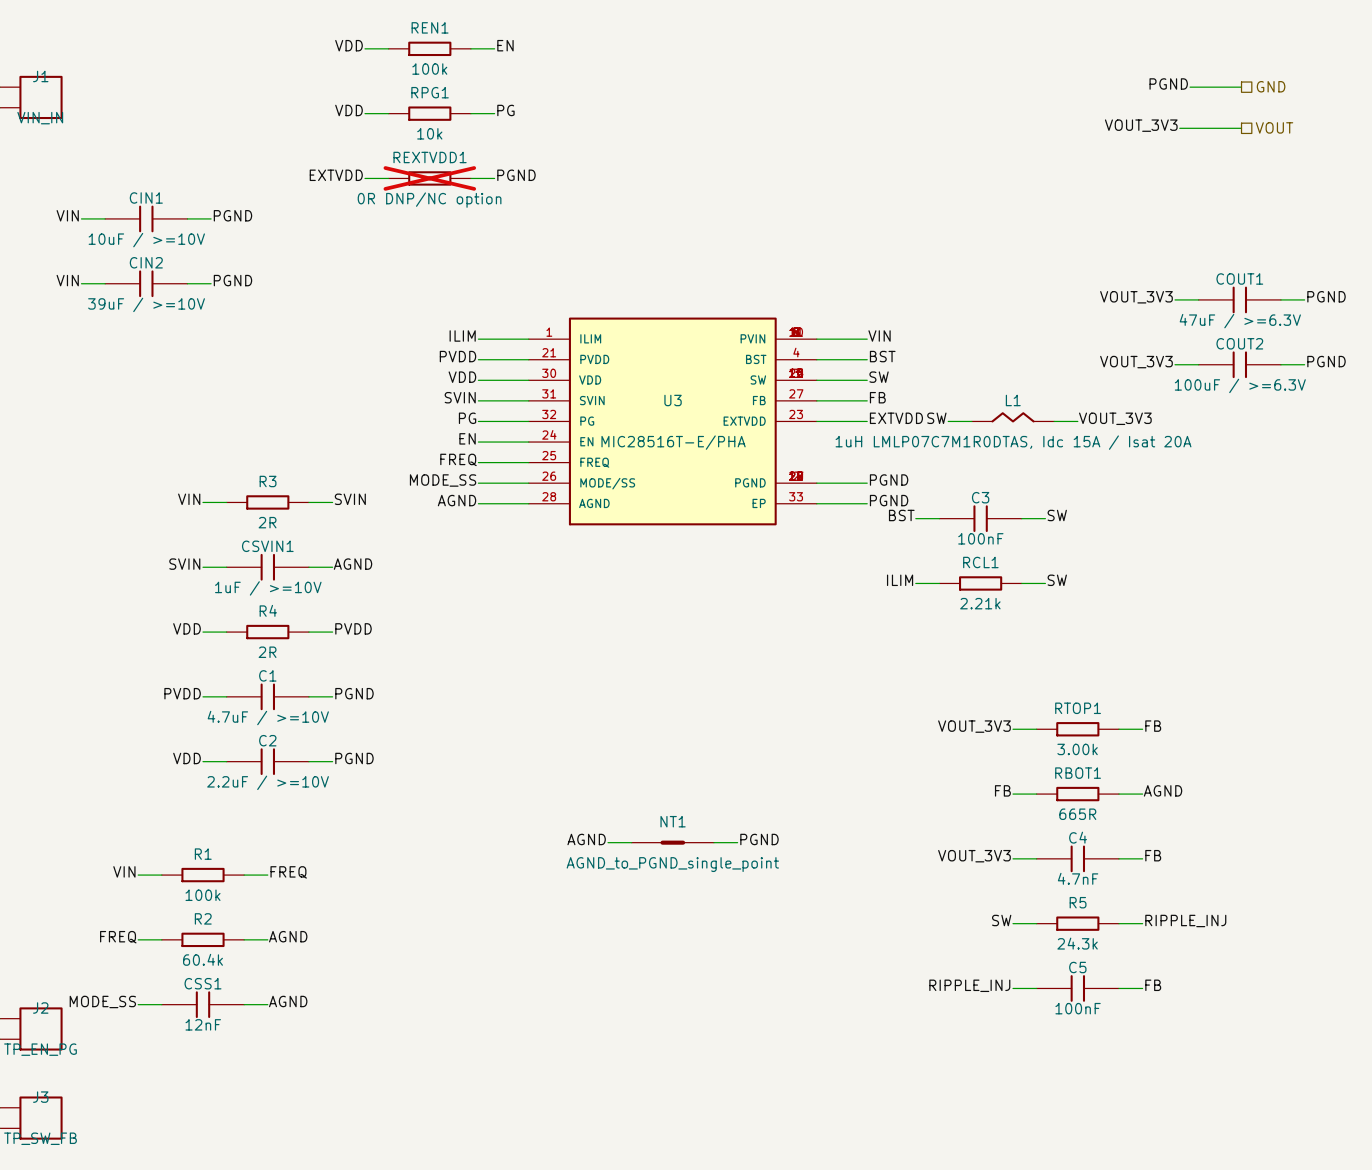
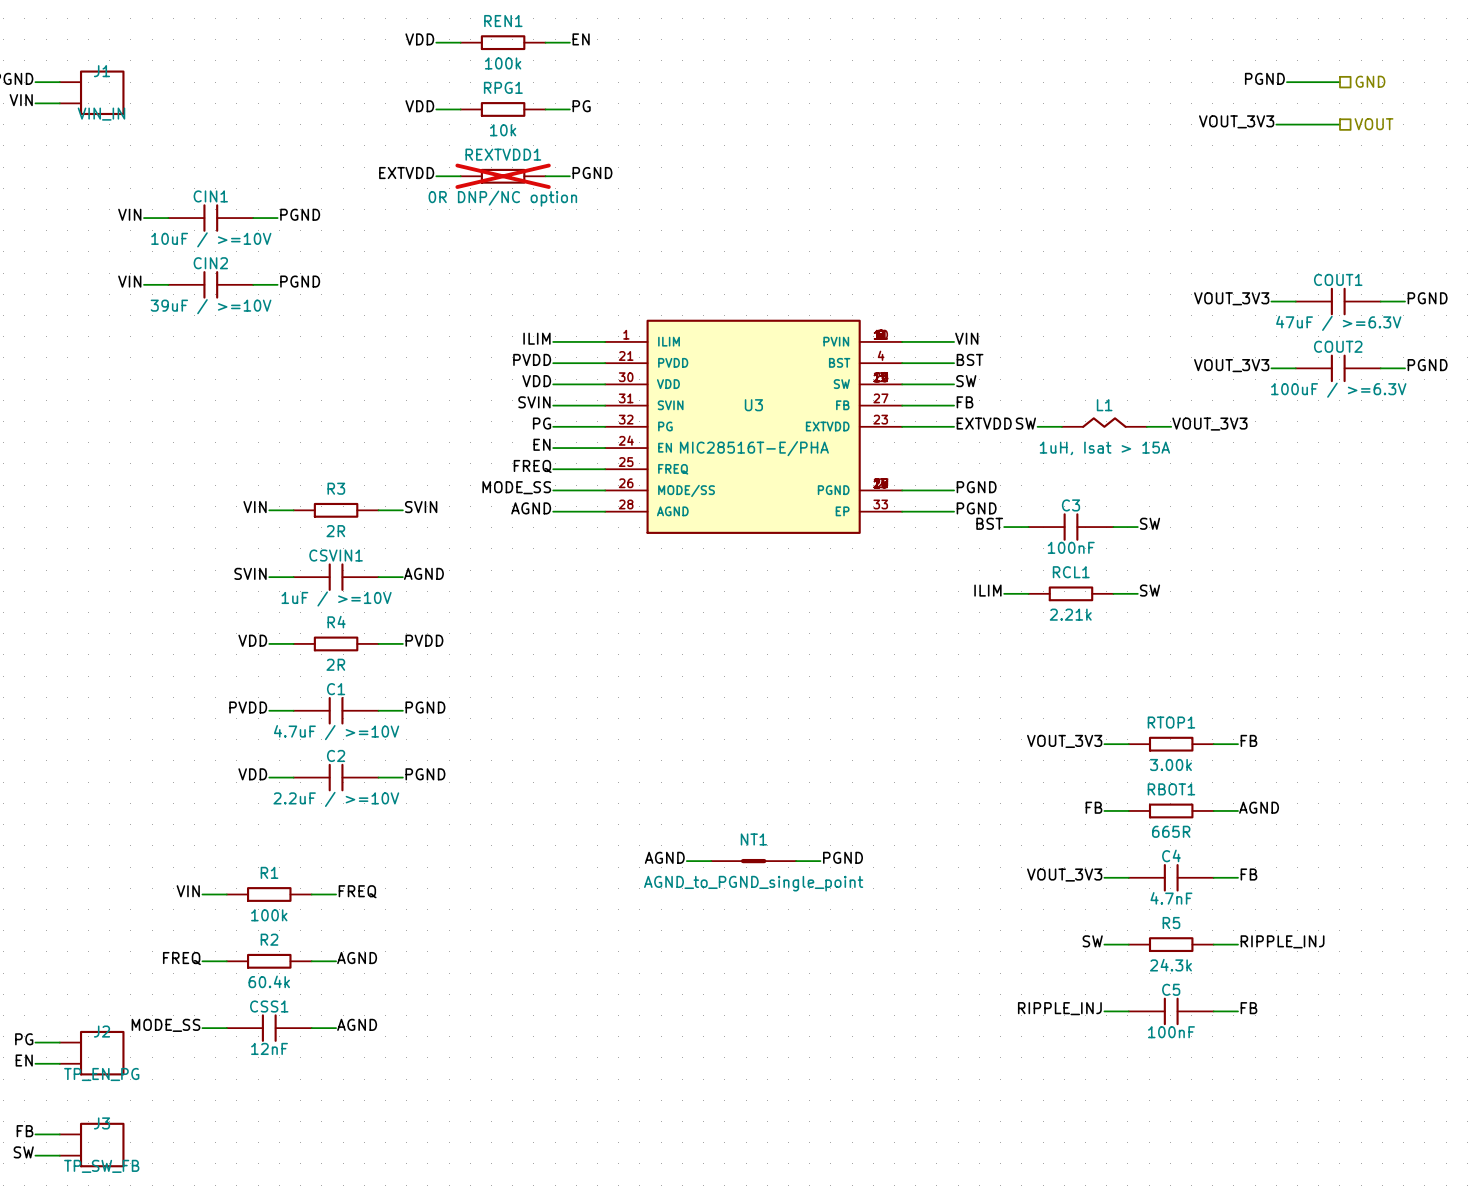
L1 value: 1uH LMLP07C7M1R0DTAS, Idc 15A / Isat 20A (1013, 442) -> 1uH, Isat > 15A (1104, 448)

